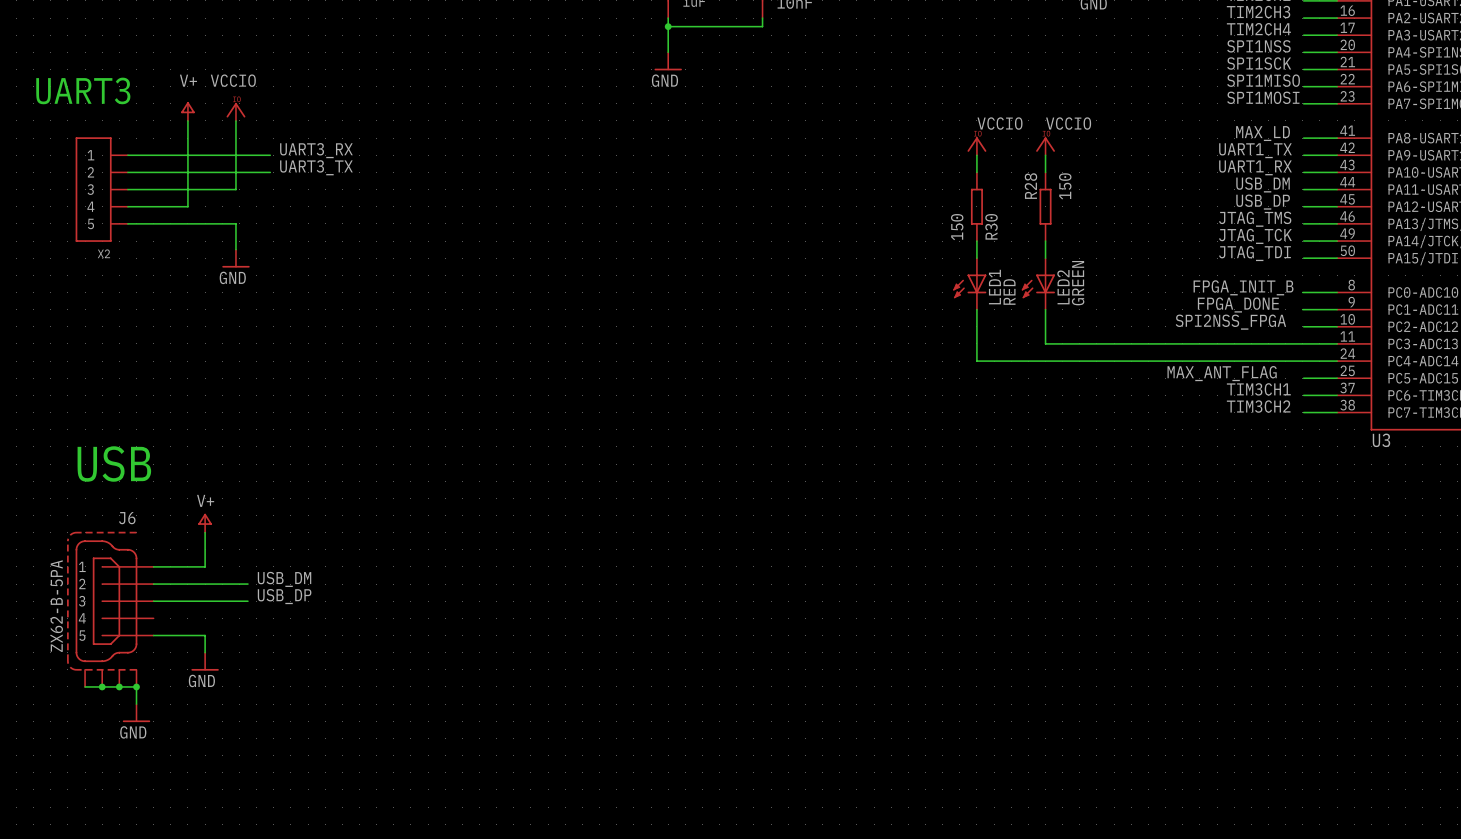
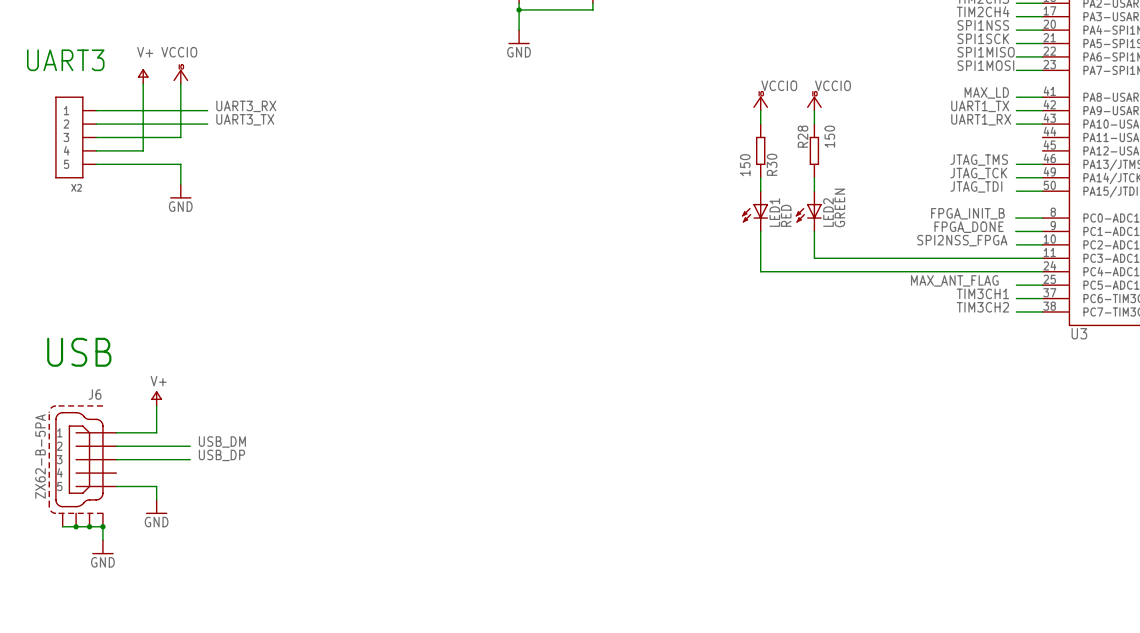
label: USB_DM (1263, 184) -> none
wire: (1303, 189) (1337, 189) -> none
label: USB_DP (1263, 202) -> none
wire: (1303, 206) (1337, 206) -> none

